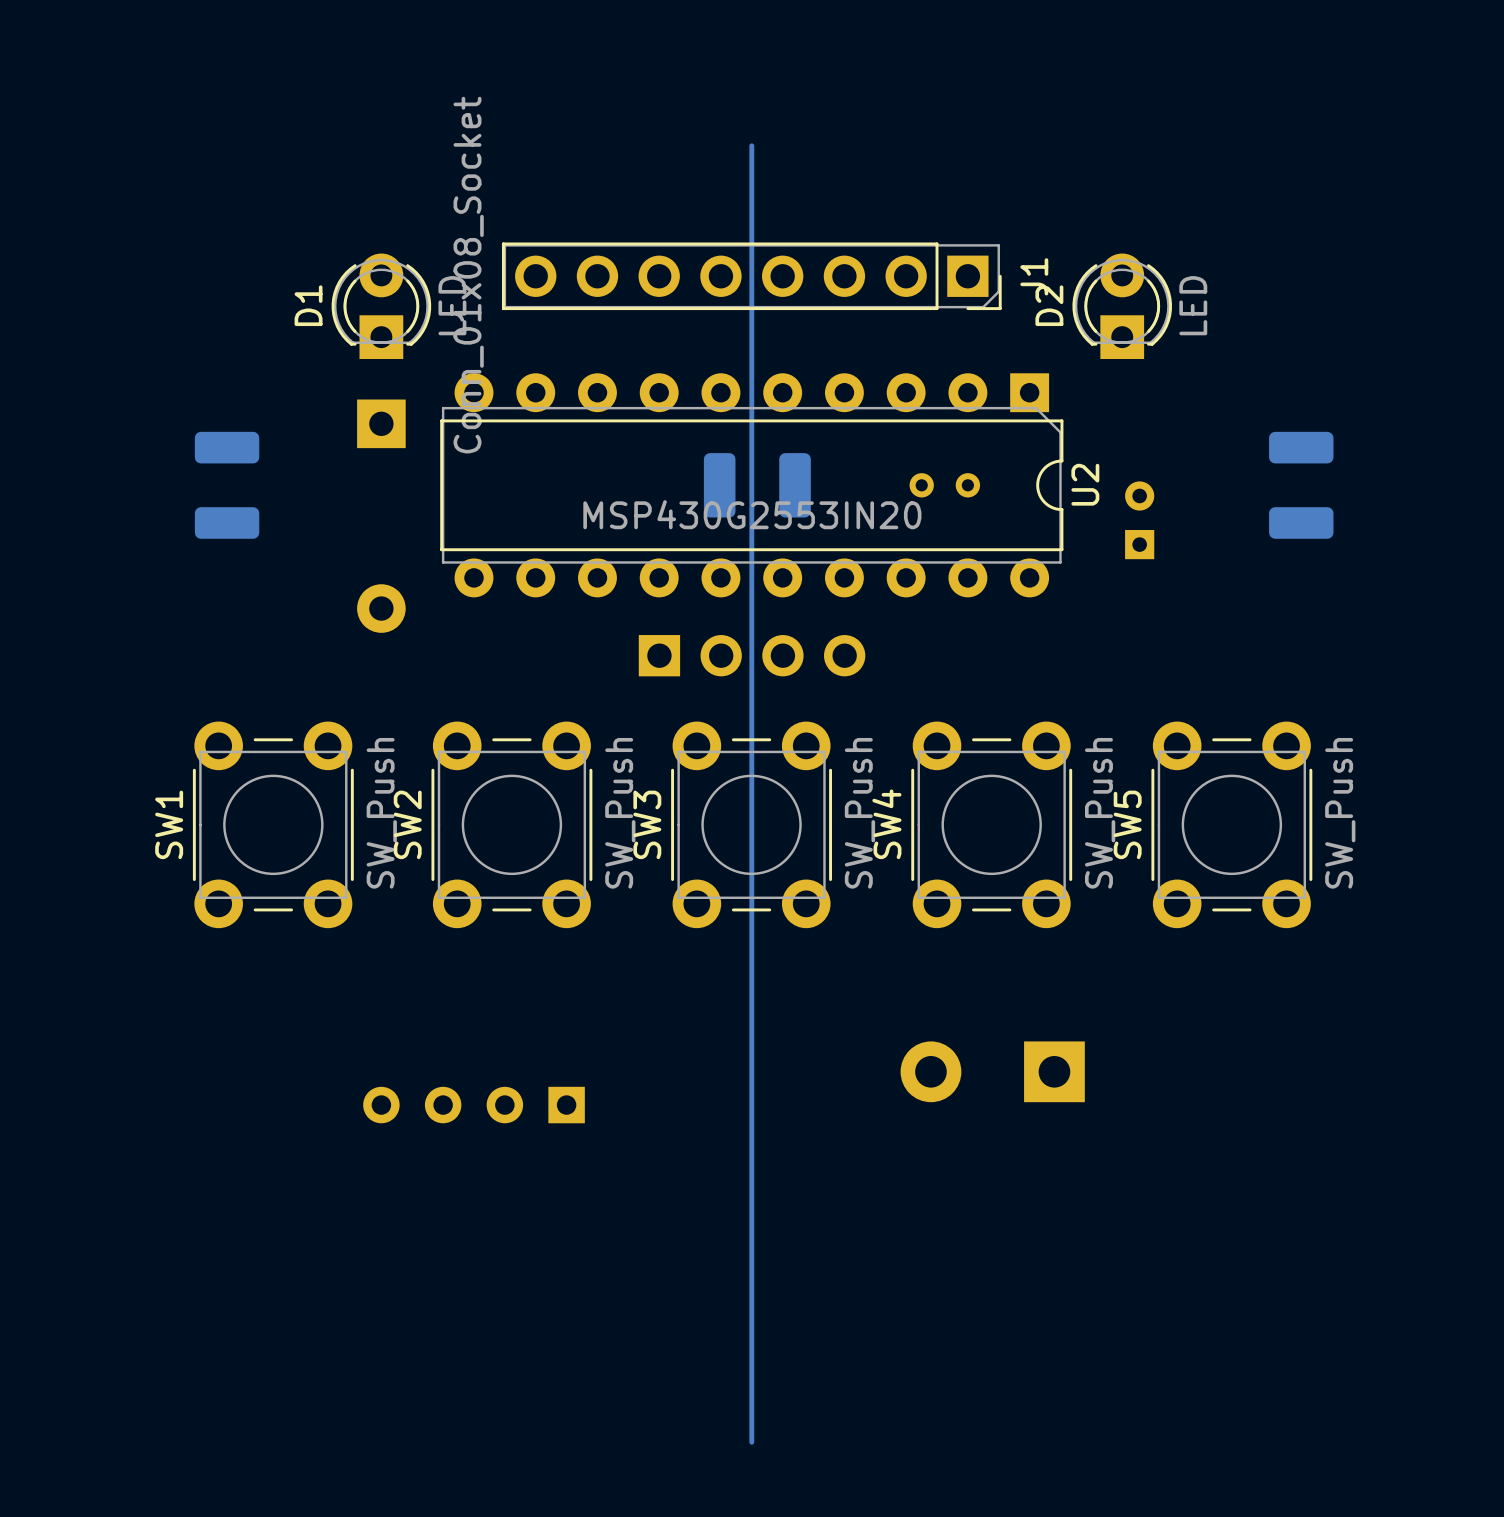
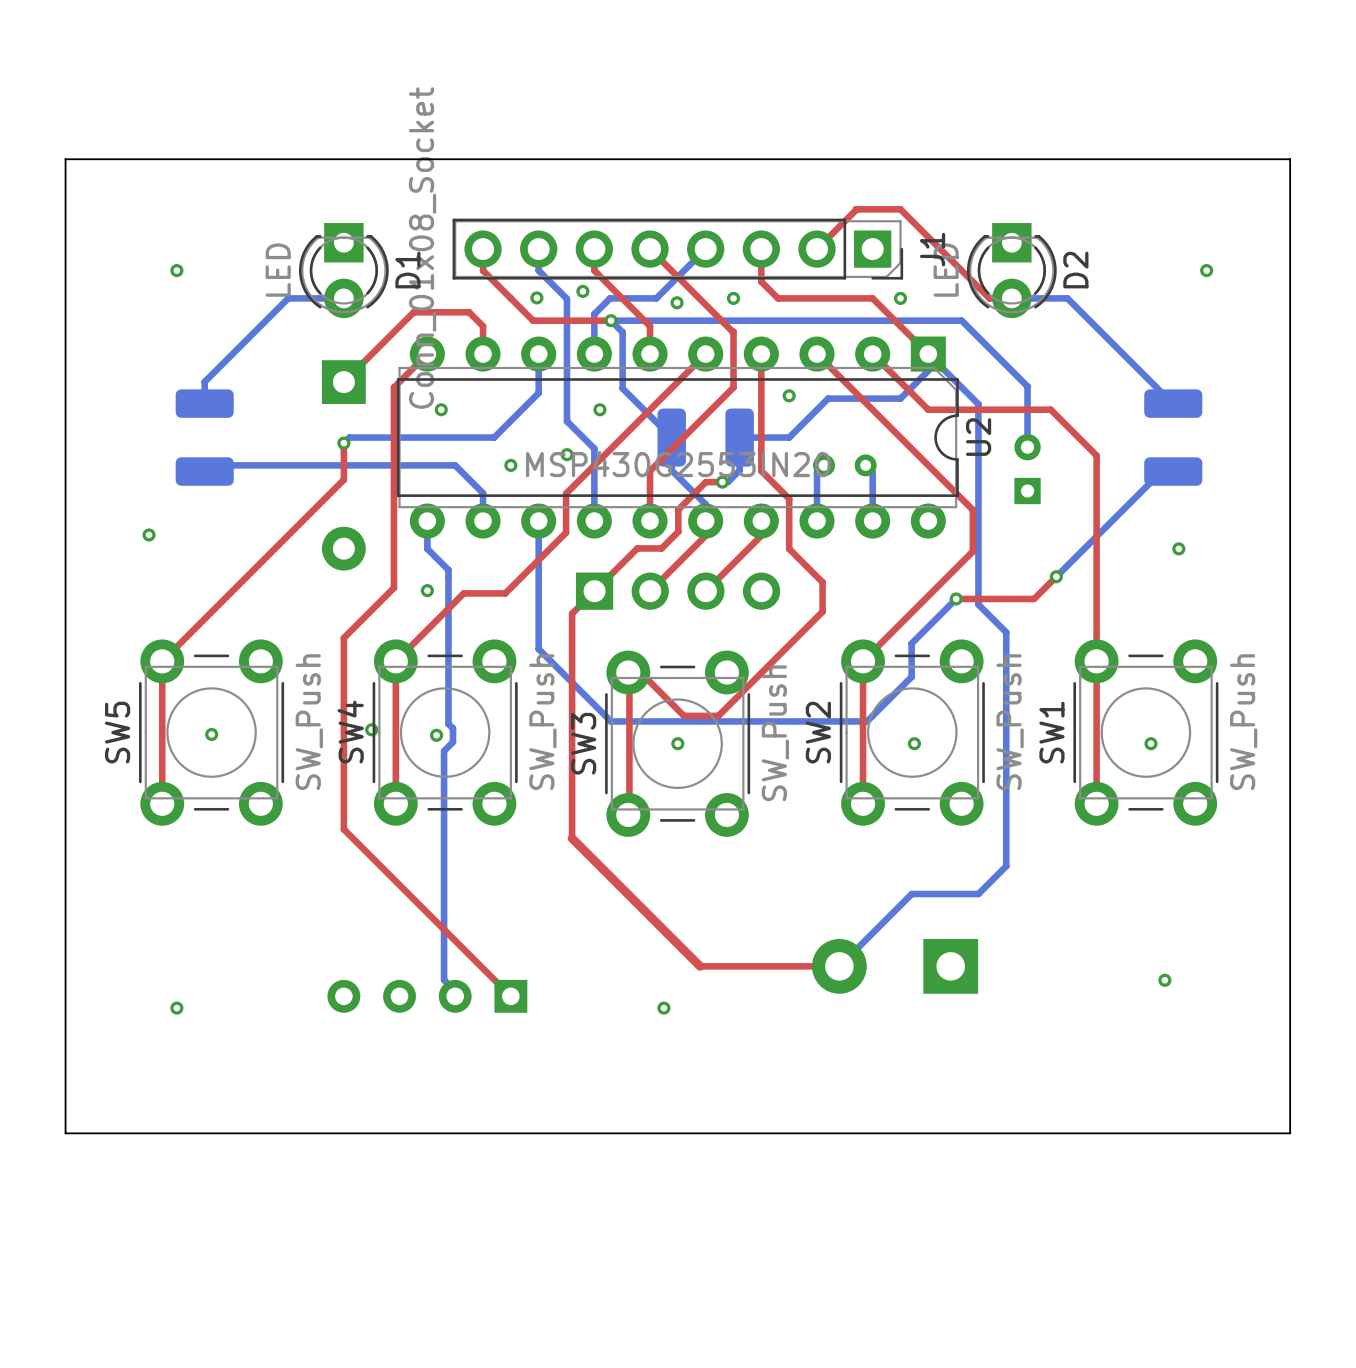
bottom track: (751, 145) (751, 1442) -> none
board edge: none -> (65, 159) (1290, 159) (1290, 1133) (65, 1133) (65, 159)
top track: none -> (483, 249) (483, 270) (533, 320) (611, 320)
bottom track: none -> (538, 249) (538, 270) (566, 298) (566, 421) (594, 448) (594, 521)
top track: none -> (594, 249) (594, 270) (650, 326) (650, 354)
top track: none -> (650, 249) (733, 331) (733, 387) (650, 470) (650, 521)
bottom track: none -> (705, 249) (656, 298) (610, 298) (594, 314) (594, 354)
top track: none -> (761, 249) (761, 281) (778, 298) (872, 298) (928, 354)
top track: none -> (817, 249) (855, 209) (900, 209) (989, 298) (1011, 298)
via: none -> (176, 270)
via: none -> (1206, 270)
D1 rotation: 0° (381, 306) -> 180° (343, 270)
D2 rotation: 0° (1122, 306) -> 180° (1011, 270)
via: none -> (582, 291)
bottom track: none -> (343, 298) (288, 298) (204, 381) (204, 403)
via: none -> (536, 297)
via: none -> (733, 298)
via: none -> (900, 298)
bottom track: none -> (1011, 298) (1067, 298) (1173, 403)
via: none -> (677, 302)
via: none -> (611, 320)
top track: none -> (427, 354) (393, 387) (393, 587) (343, 637) (343, 829) (510, 996)
top track: none -> (483, 354) (483, 326) (469, 312) (413, 312) (343, 382)
bottom track: none -> (538, 354) (538, 393) (494, 437) (349, 437) (343, 443)
top track: none -> (705, 354) (566, 493) (566, 532) (505, 593) (463, 593) (395, 661) (395, 803)
top track: none -> (761, 354) (761, 470) (789, 498) (789, 548) (822, 582) (822, 611) (718, 715) (683, 715) (629, 661) (629, 803)
top track: none -> (817, 354) (972, 509) (972, 551) (863, 661) (863, 803)
top track: none -> (872, 354) (928, 409) (1050, 409) (1096, 455) (1096, 803)
bottom track: none -> (928, 354) (978, 404) (978, 604) (1006, 632) (1006, 866) (978, 894) (911, 894) (839, 966)
bottom track: none -> (928, 354) (928, 370) (900, 398) (828, 398) (789, 437) (739, 437) (739, 470) (727, 482) (722, 482)
via: none -> (789, 395)
via: none -> (441, 409)
via: none -> (599, 409)
part position: (757, 485) -> (705, 437)
part position: (944, 485) -> (844, 465)
top track: none -> (343, 443) (343, 479) (162, 661) (162, 803)
via: none -> (343, 443)
bottom track: none -> (1027, 447) (1027, 386) (961, 320) (611, 320) (622, 332) (622, 388) (671, 437) (671, 470) (705, 504) (705, 535)
via: none -> (567, 454)
via: none -> (510, 465)
bottom track: none -> (824, 465) (817, 472) (817, 521)
bottom track: none -> (865, 465) (872, 472) (872, 521)
bottom track: none -> (204, 471) (210, 465) (455, 465) (483, 493) (483, 521)
bottom track: none -> (1173, 471) (1161, 471) (1056, 576)
top track: none -> (722, 482) (705, 482) (678, 509) (678, 531) (661, 548) (637, 548) (572, 613) (572, 838) (700, 966) (839, 966)
via: none -> (722, 482)
bottom track: none -> (427, 521) (427, 548) (448, 570) (448, 723) (453, 728) (453, 742) (444, 751) (444, 979) (460, 996)
bottom track: none -> (538, 521) (538, 649) (611, 721) (867, 721) (911, 676) (911, 643) (956, 598)
top track: none -> (705, 521) (705, 535) (650, 591)
top track: none -> (761, 521) (761, 535) (705, 591)
via: none -> (149, 534)
via: none -> (1178, 548)
top track: none -> (1056, 576) (1034, 598) (956, 598)
via: none -> (1056, 576)
via: none -> (427, 590)
via: none -> (956, 598)
via: none -> (371, 729)
via: none -> (211, 734)
via: none -> (436, 735)
SW1 position: (273, 824) -> (1145, 732)
SW2 position: (511, 824) -> (912, 732)
via: none -> (677, 743)
SW4 position: (991, 824) -> (445, 732)
via: none -> (914, 743)
SW5 position: (1231, 824) -> (211, 732)
via: none -> (1150, 743)
via: none -> (1164, 980)
via: none -> (176, 1008)
via: none -> (663, 1008)

